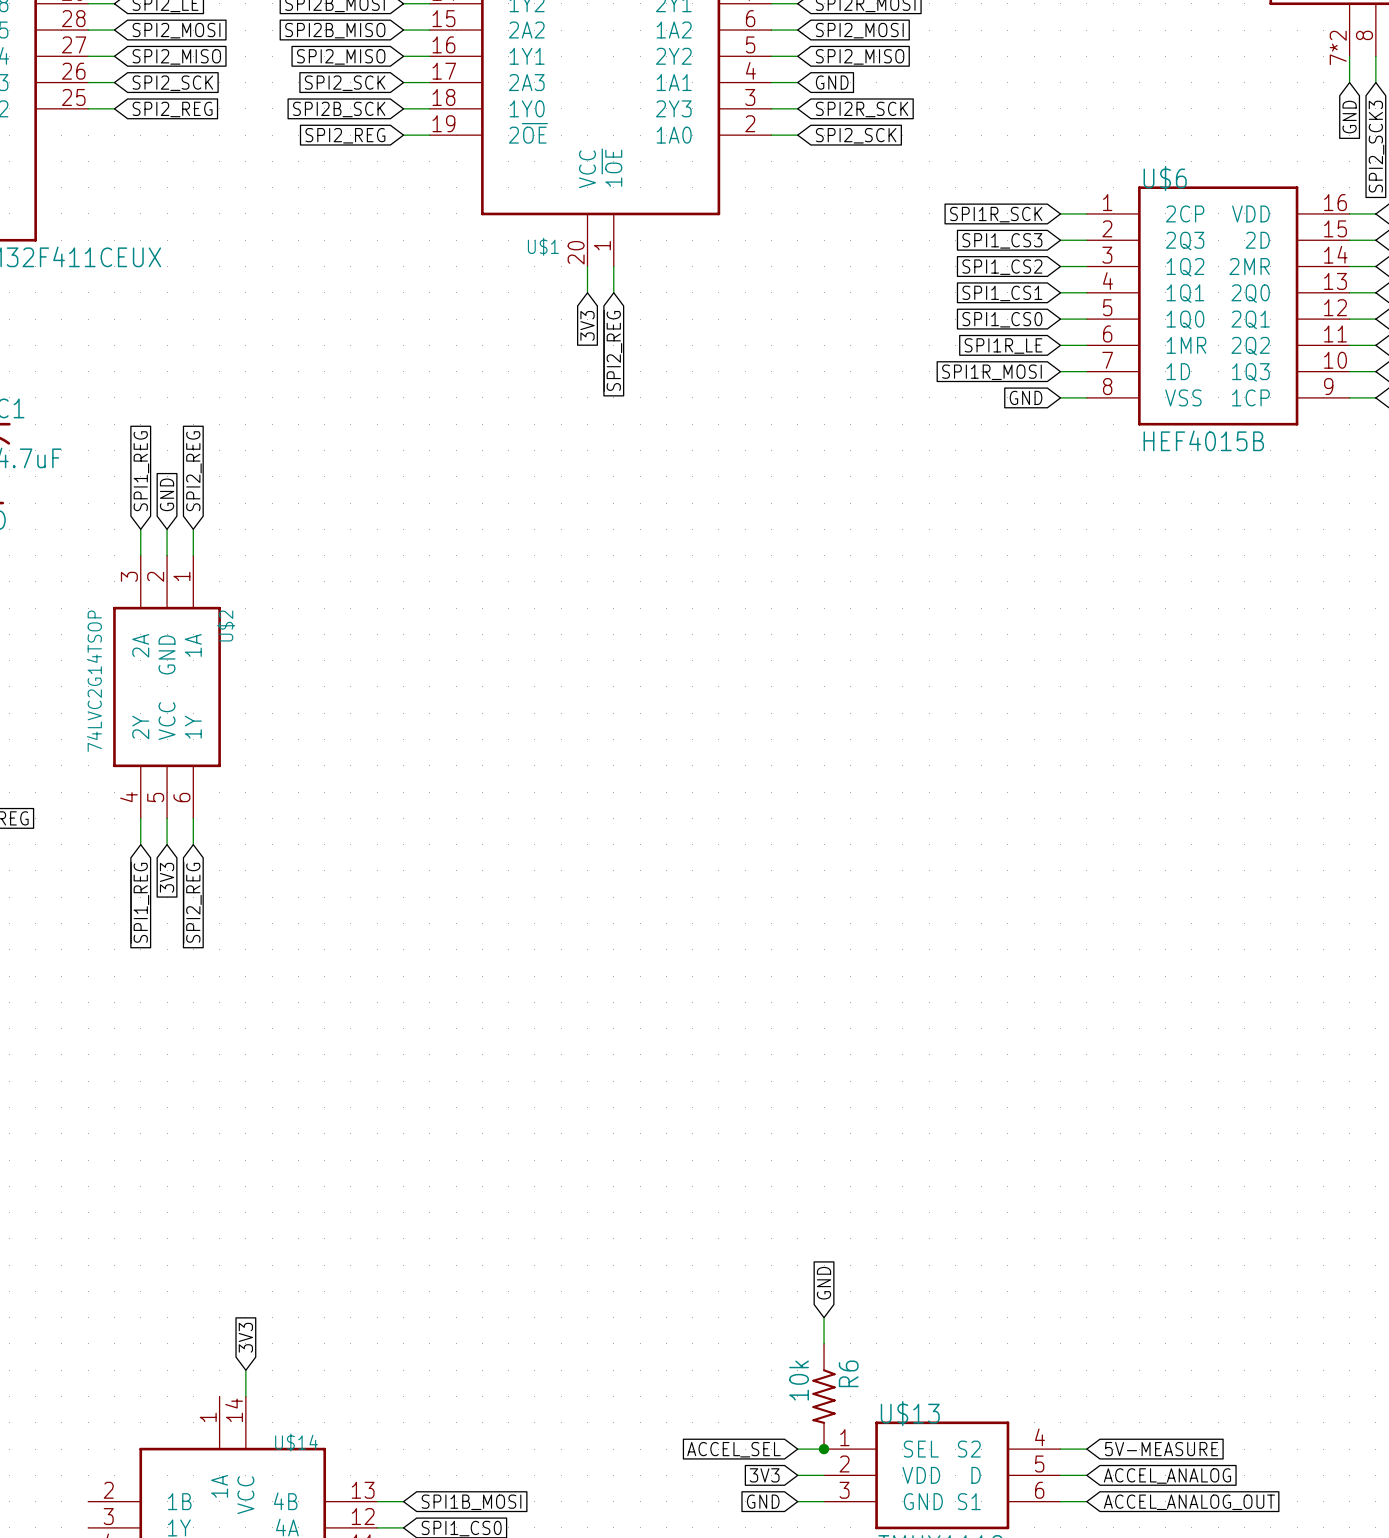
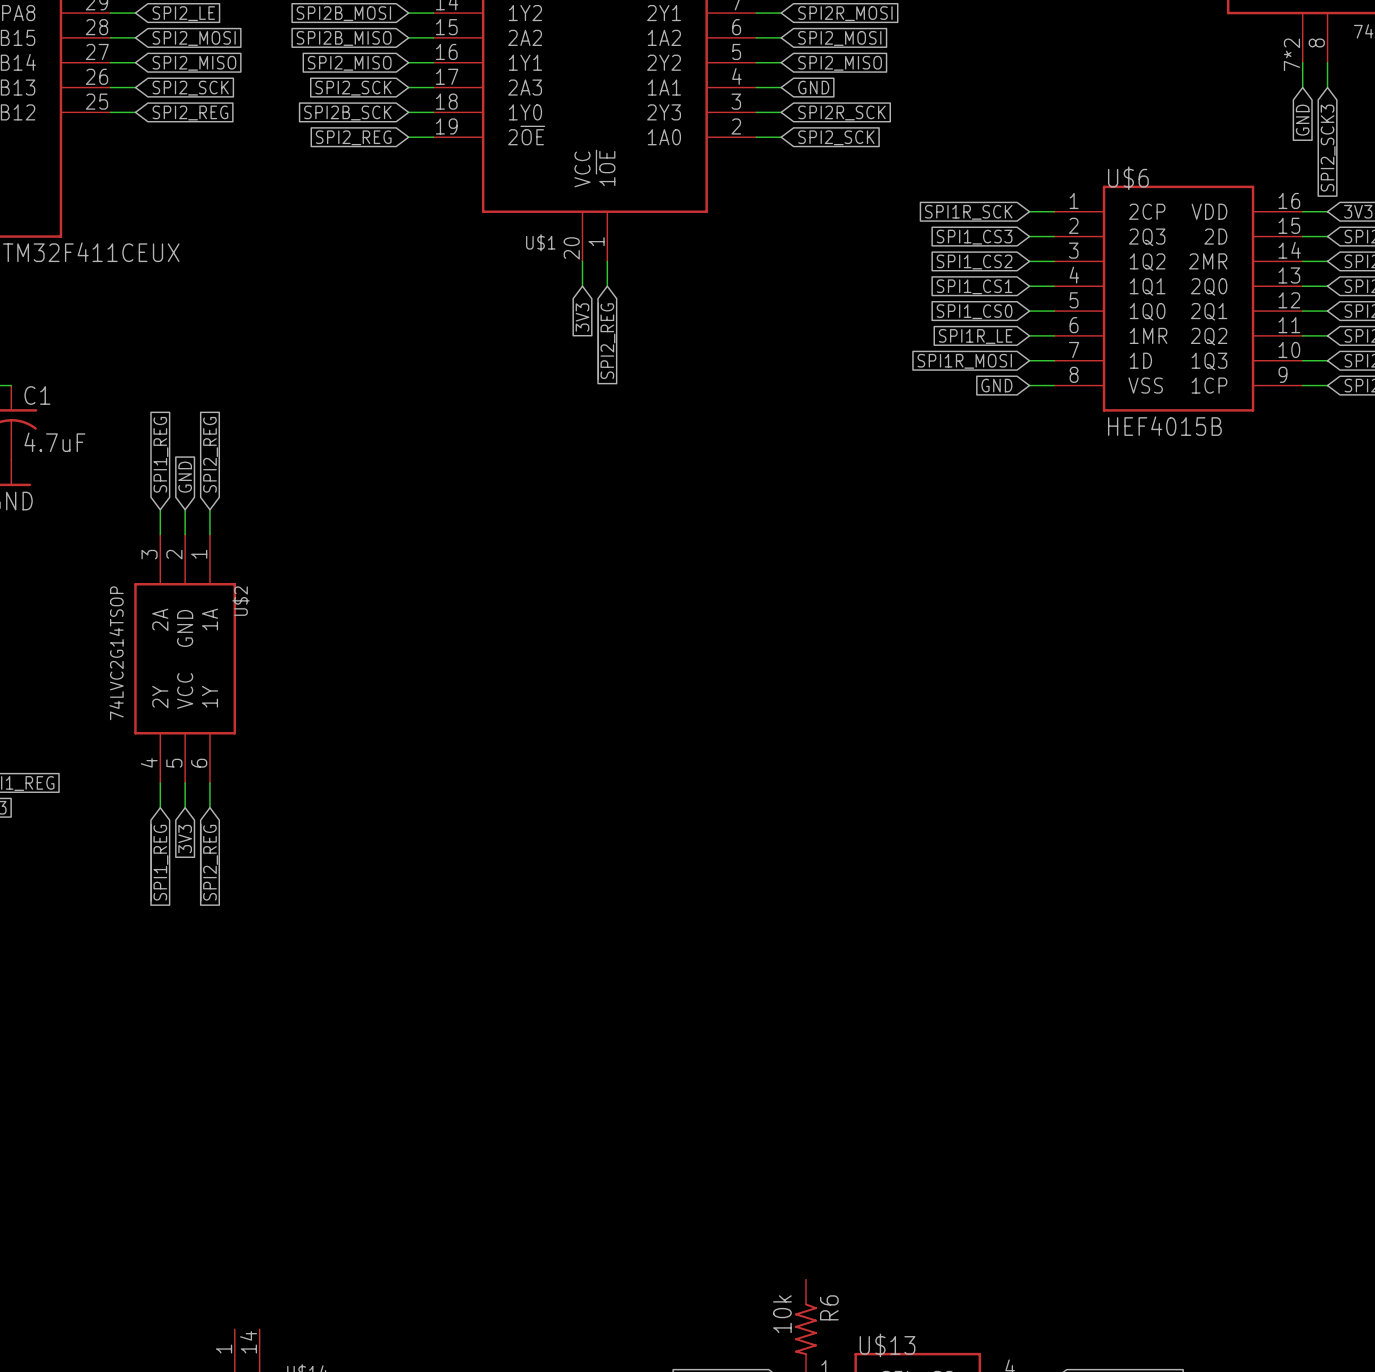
global label: GND (824, 1283) -> none
wire: (824, 1317) (824, 1343) -> none
global label: 3V3 (245, 1337) -> none
wire: (245, 1370) (245, 1396) -> none

